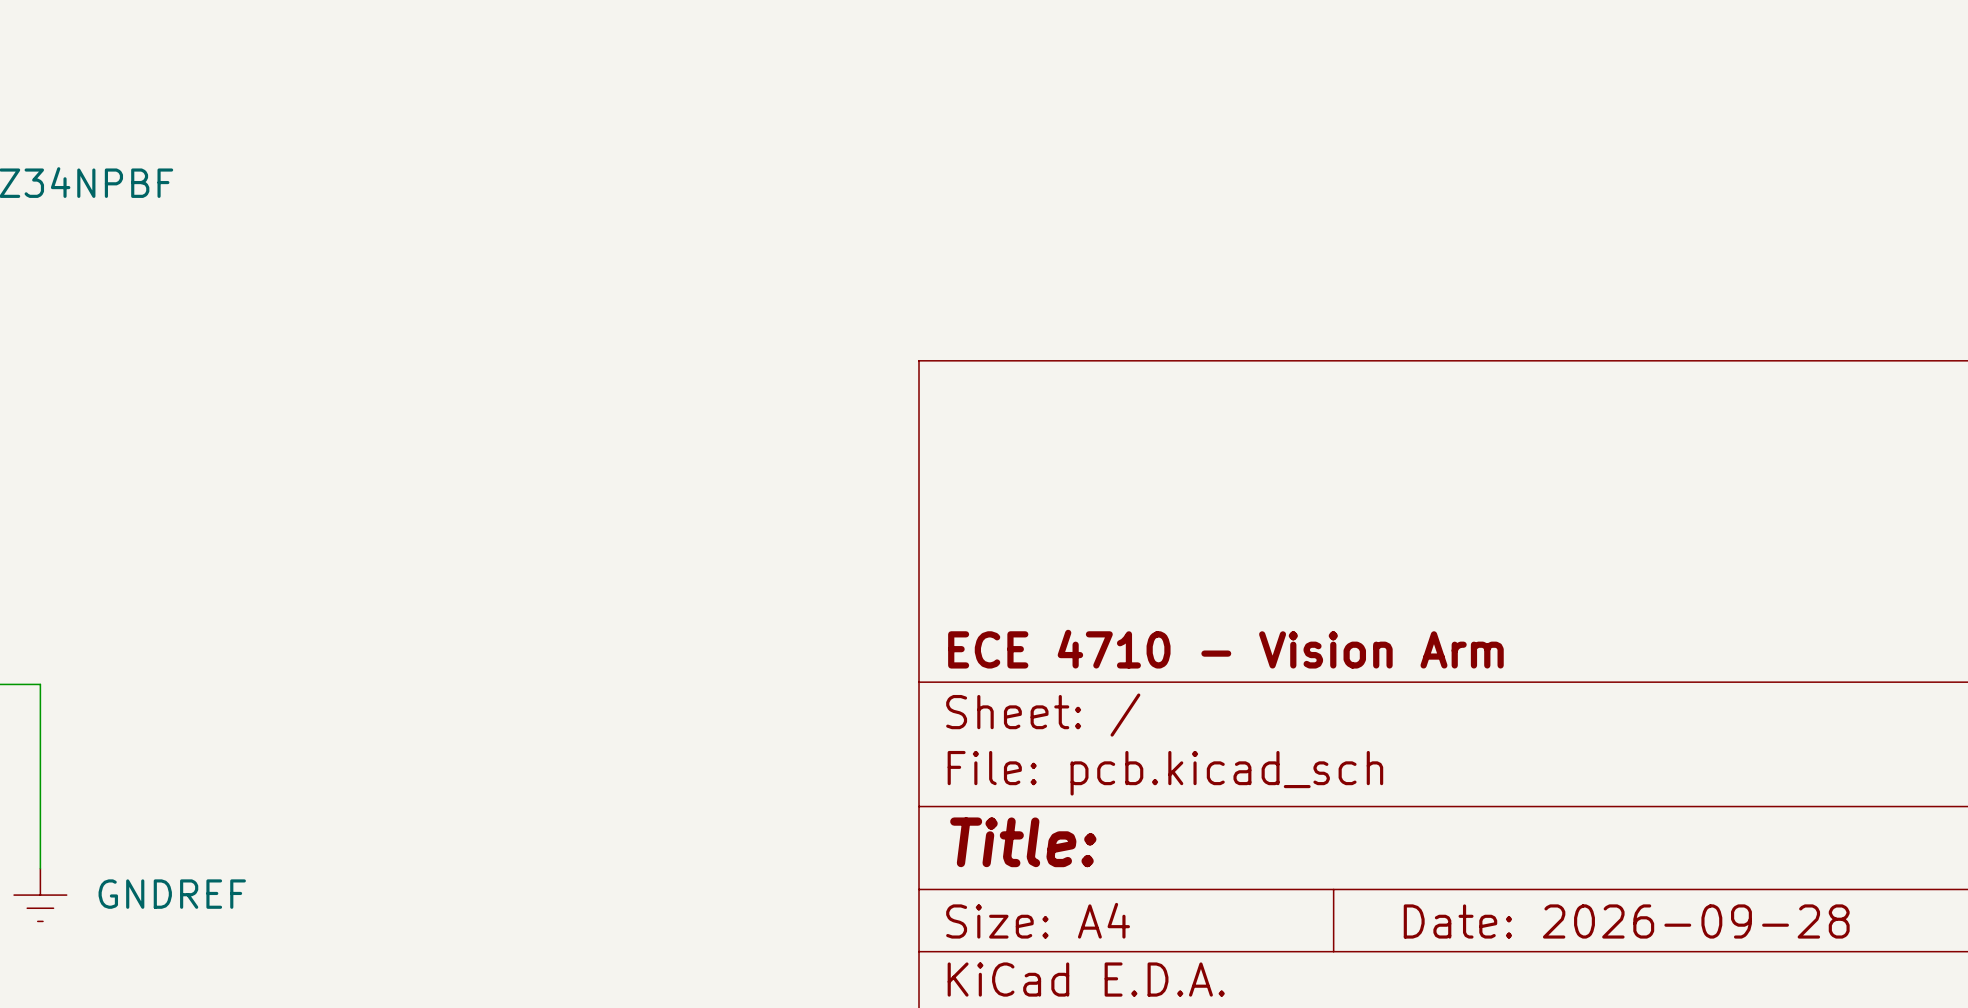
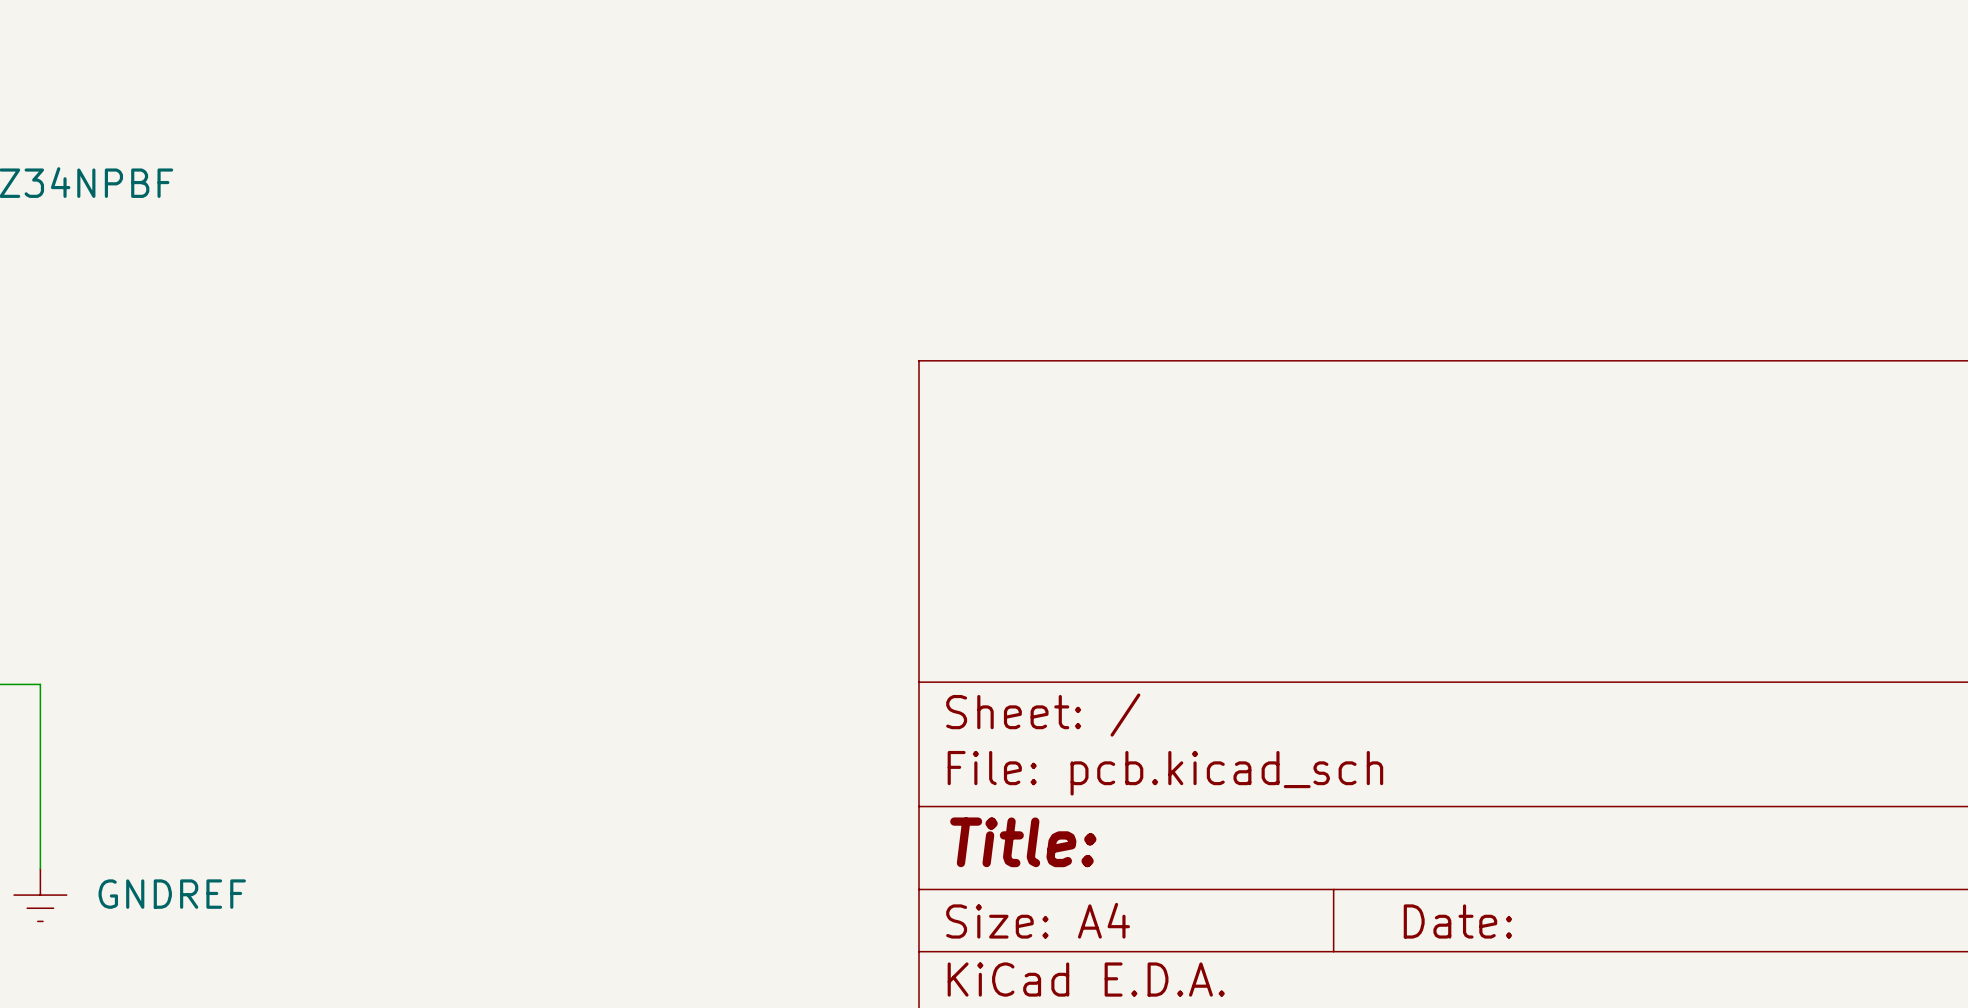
title block: ECE 4710 - Vision Arm (1225, 649) -> none
title block: Date: 2026-09-28 (1626, 921) -> Date: (1457, 921)

